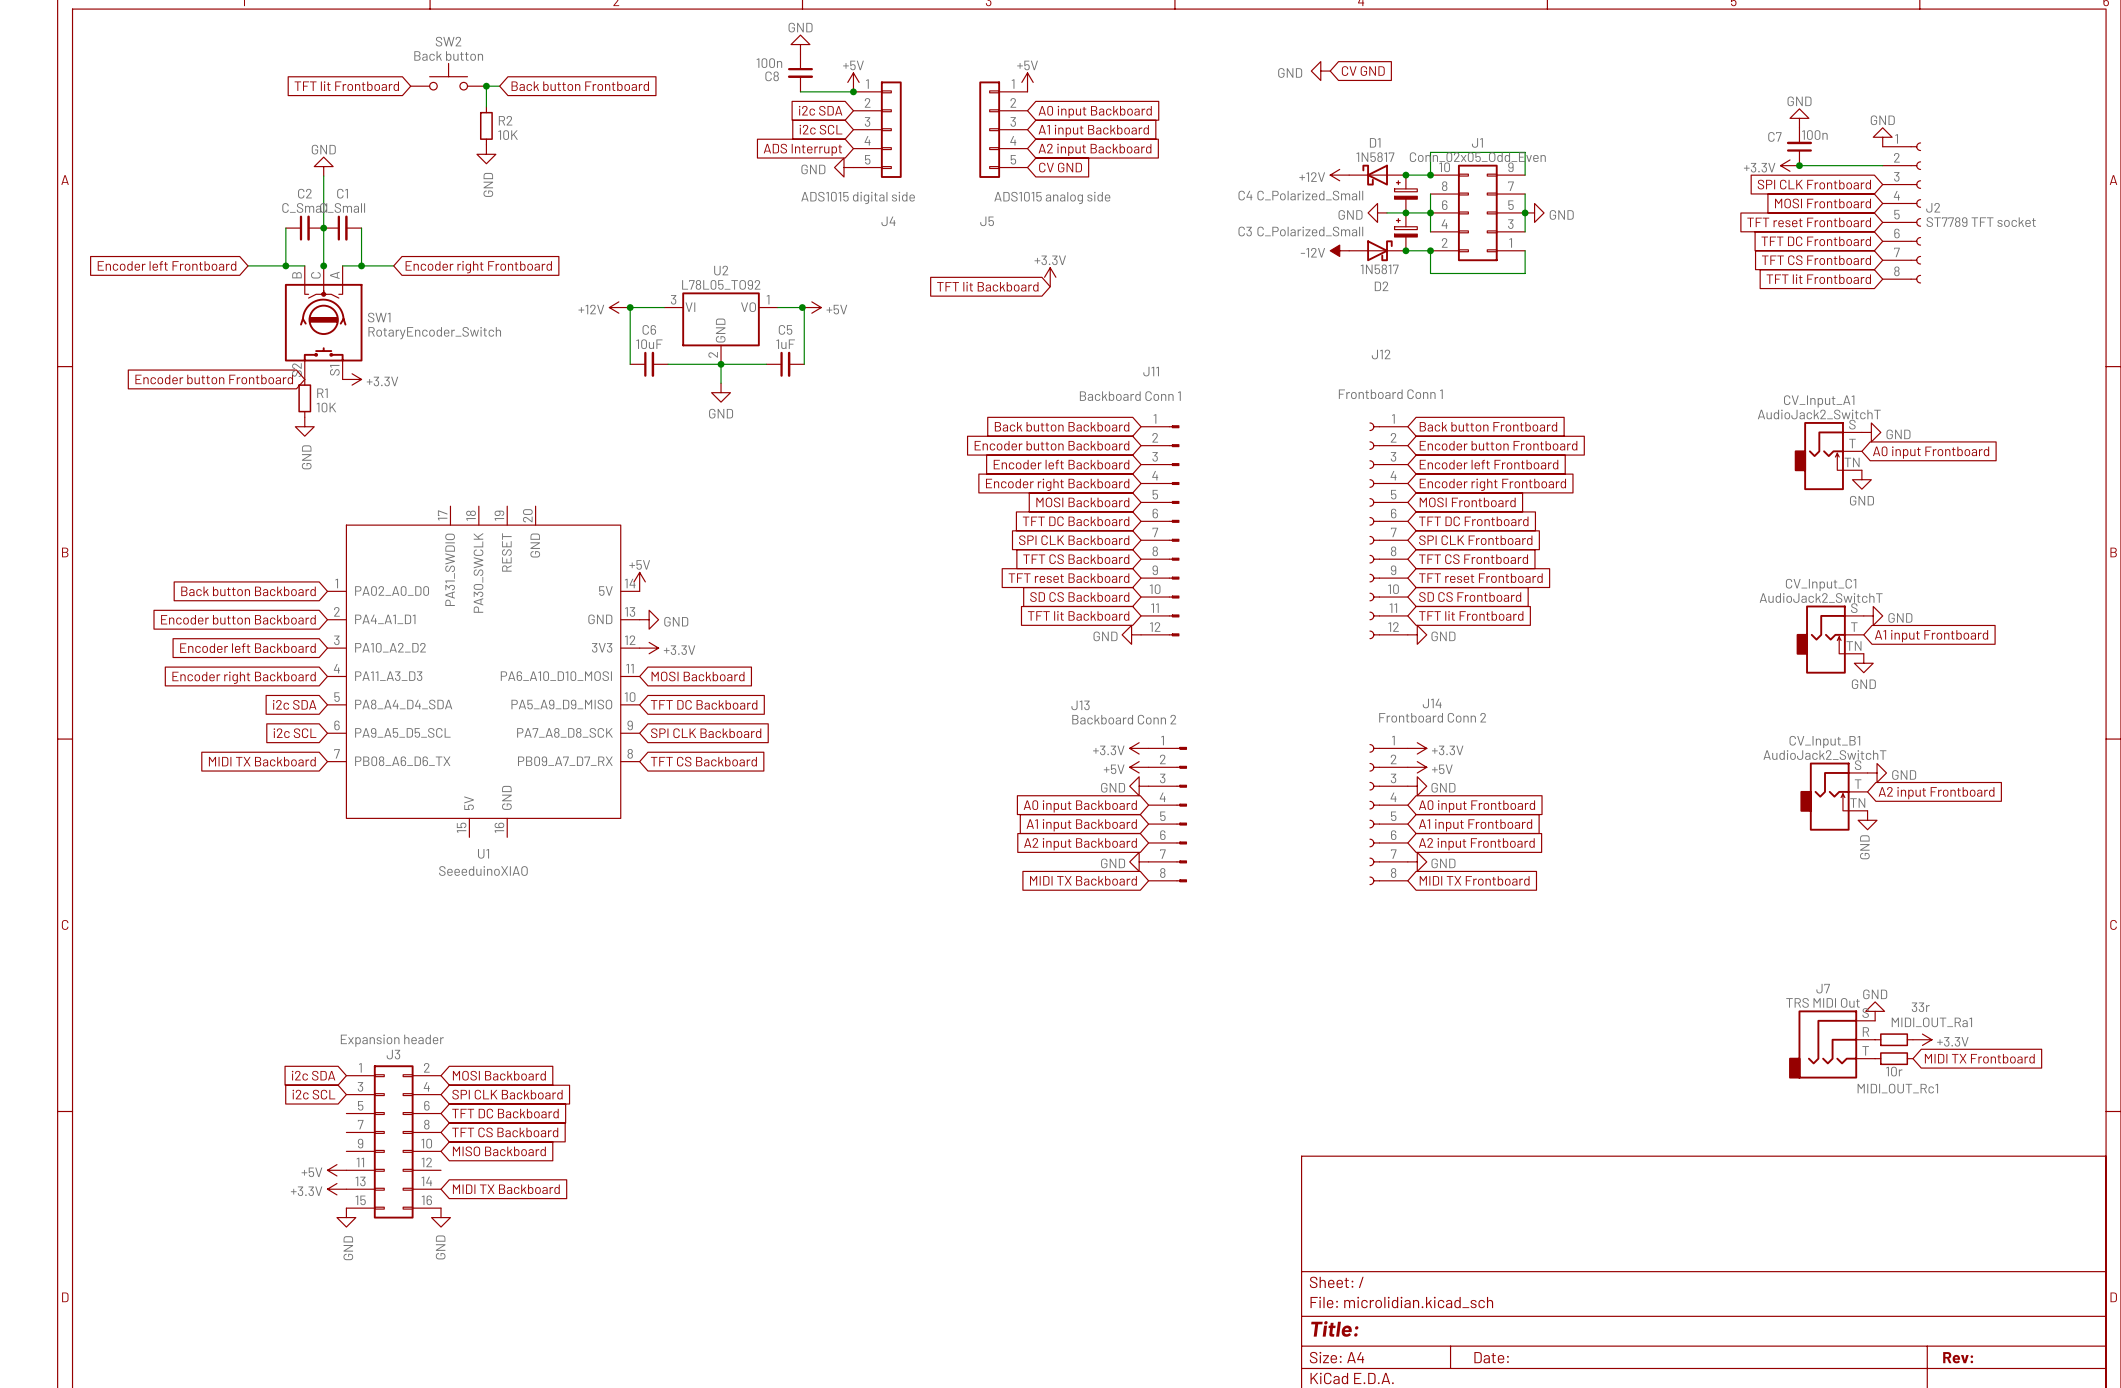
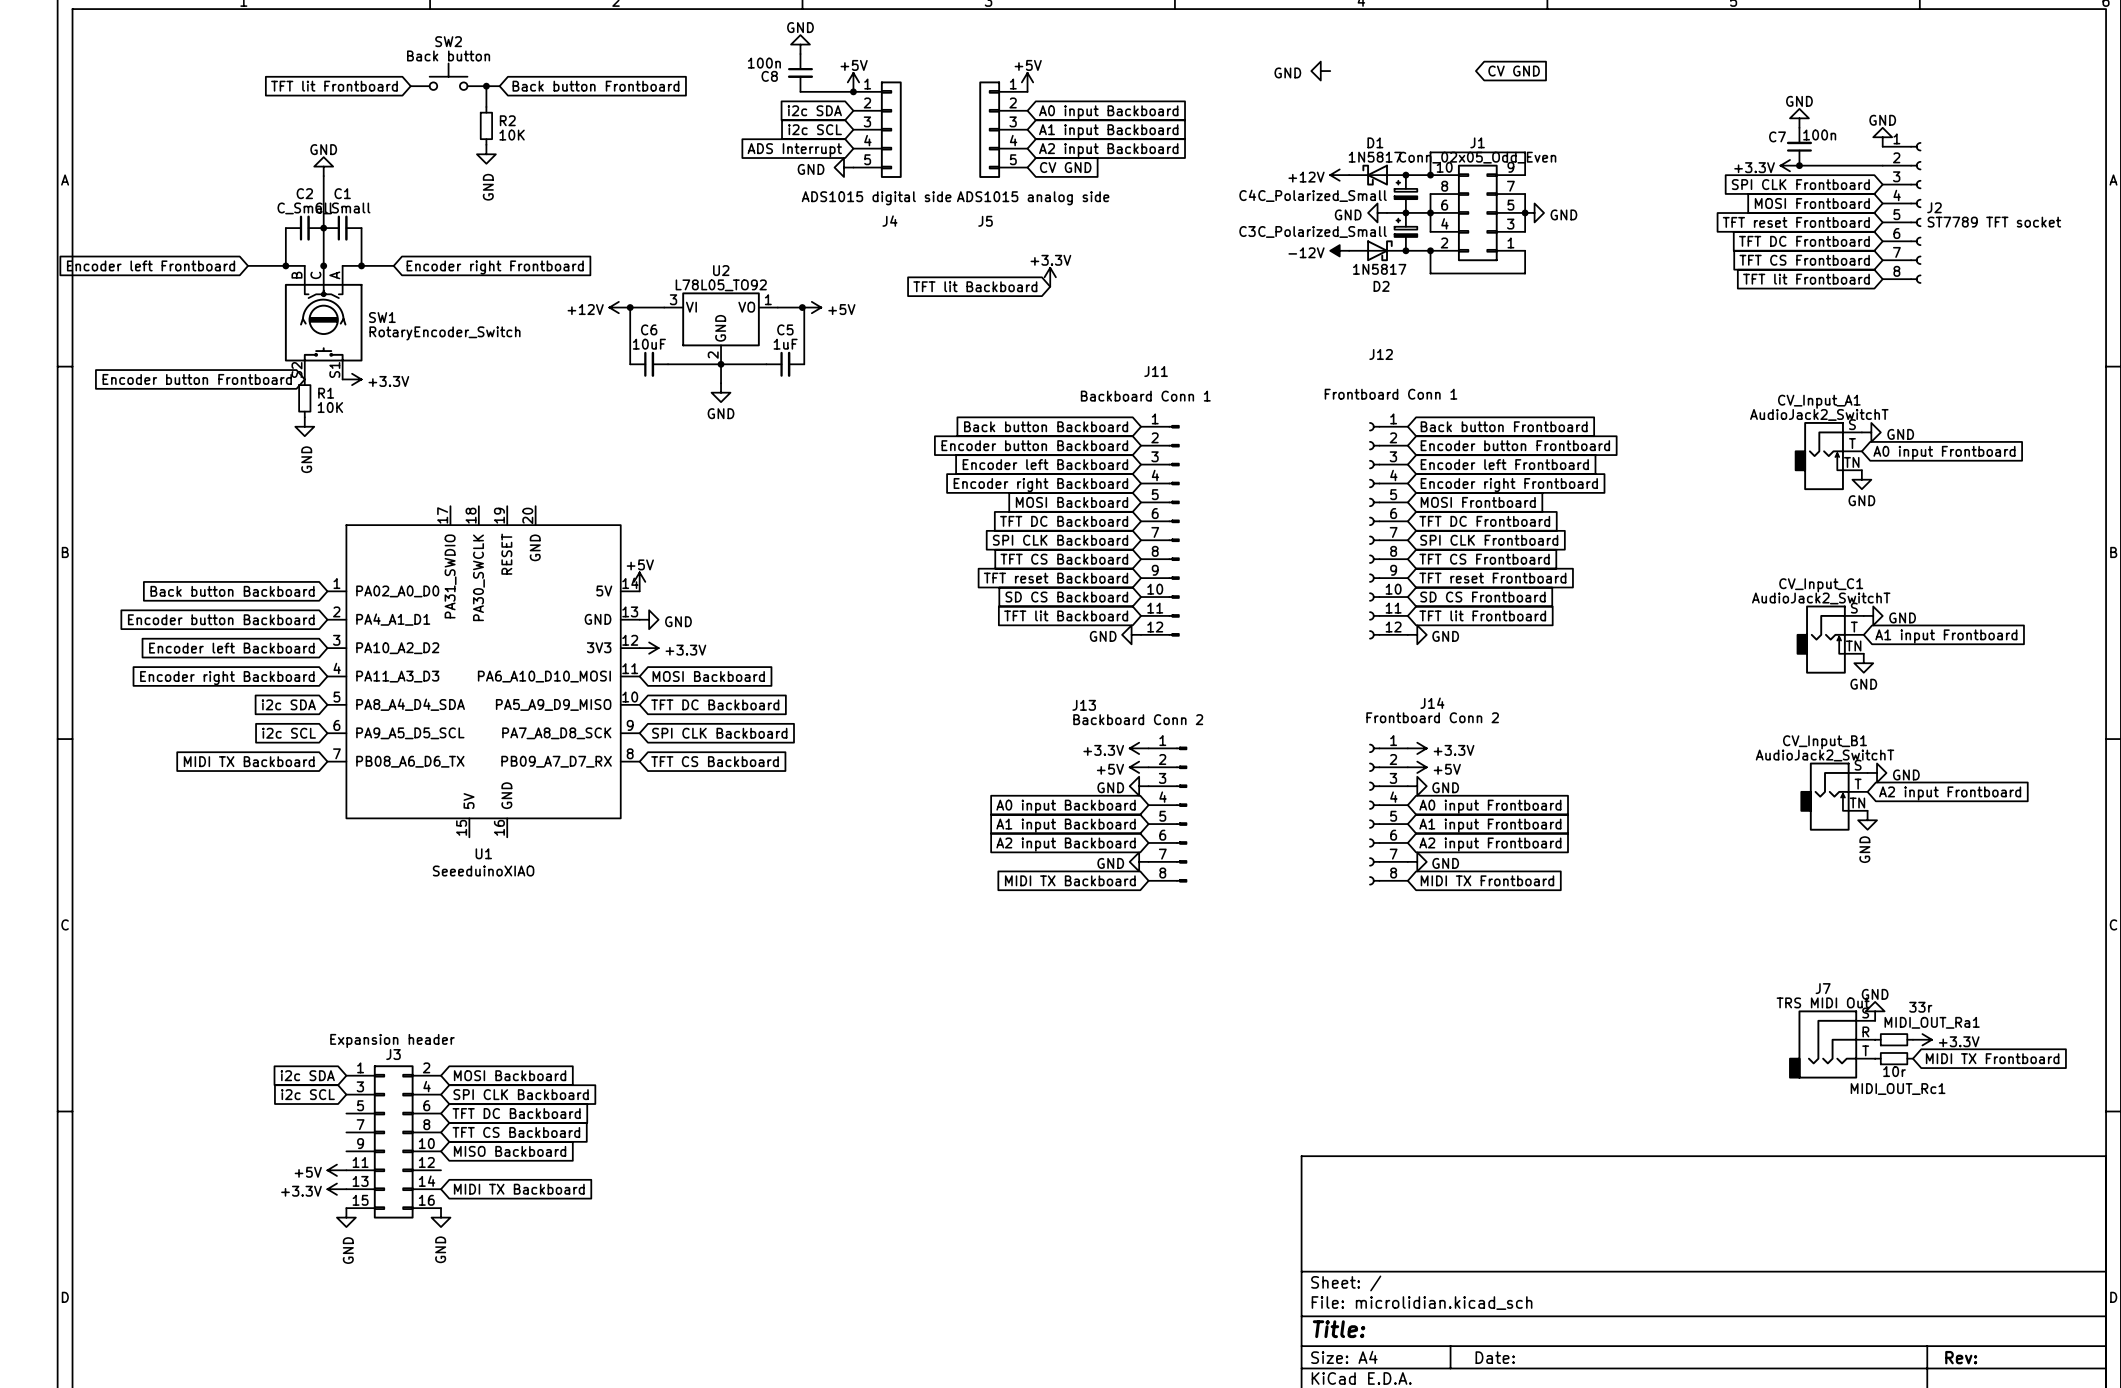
global label position: CV GND (1363, 71) -> CV GND (1514, 71)

